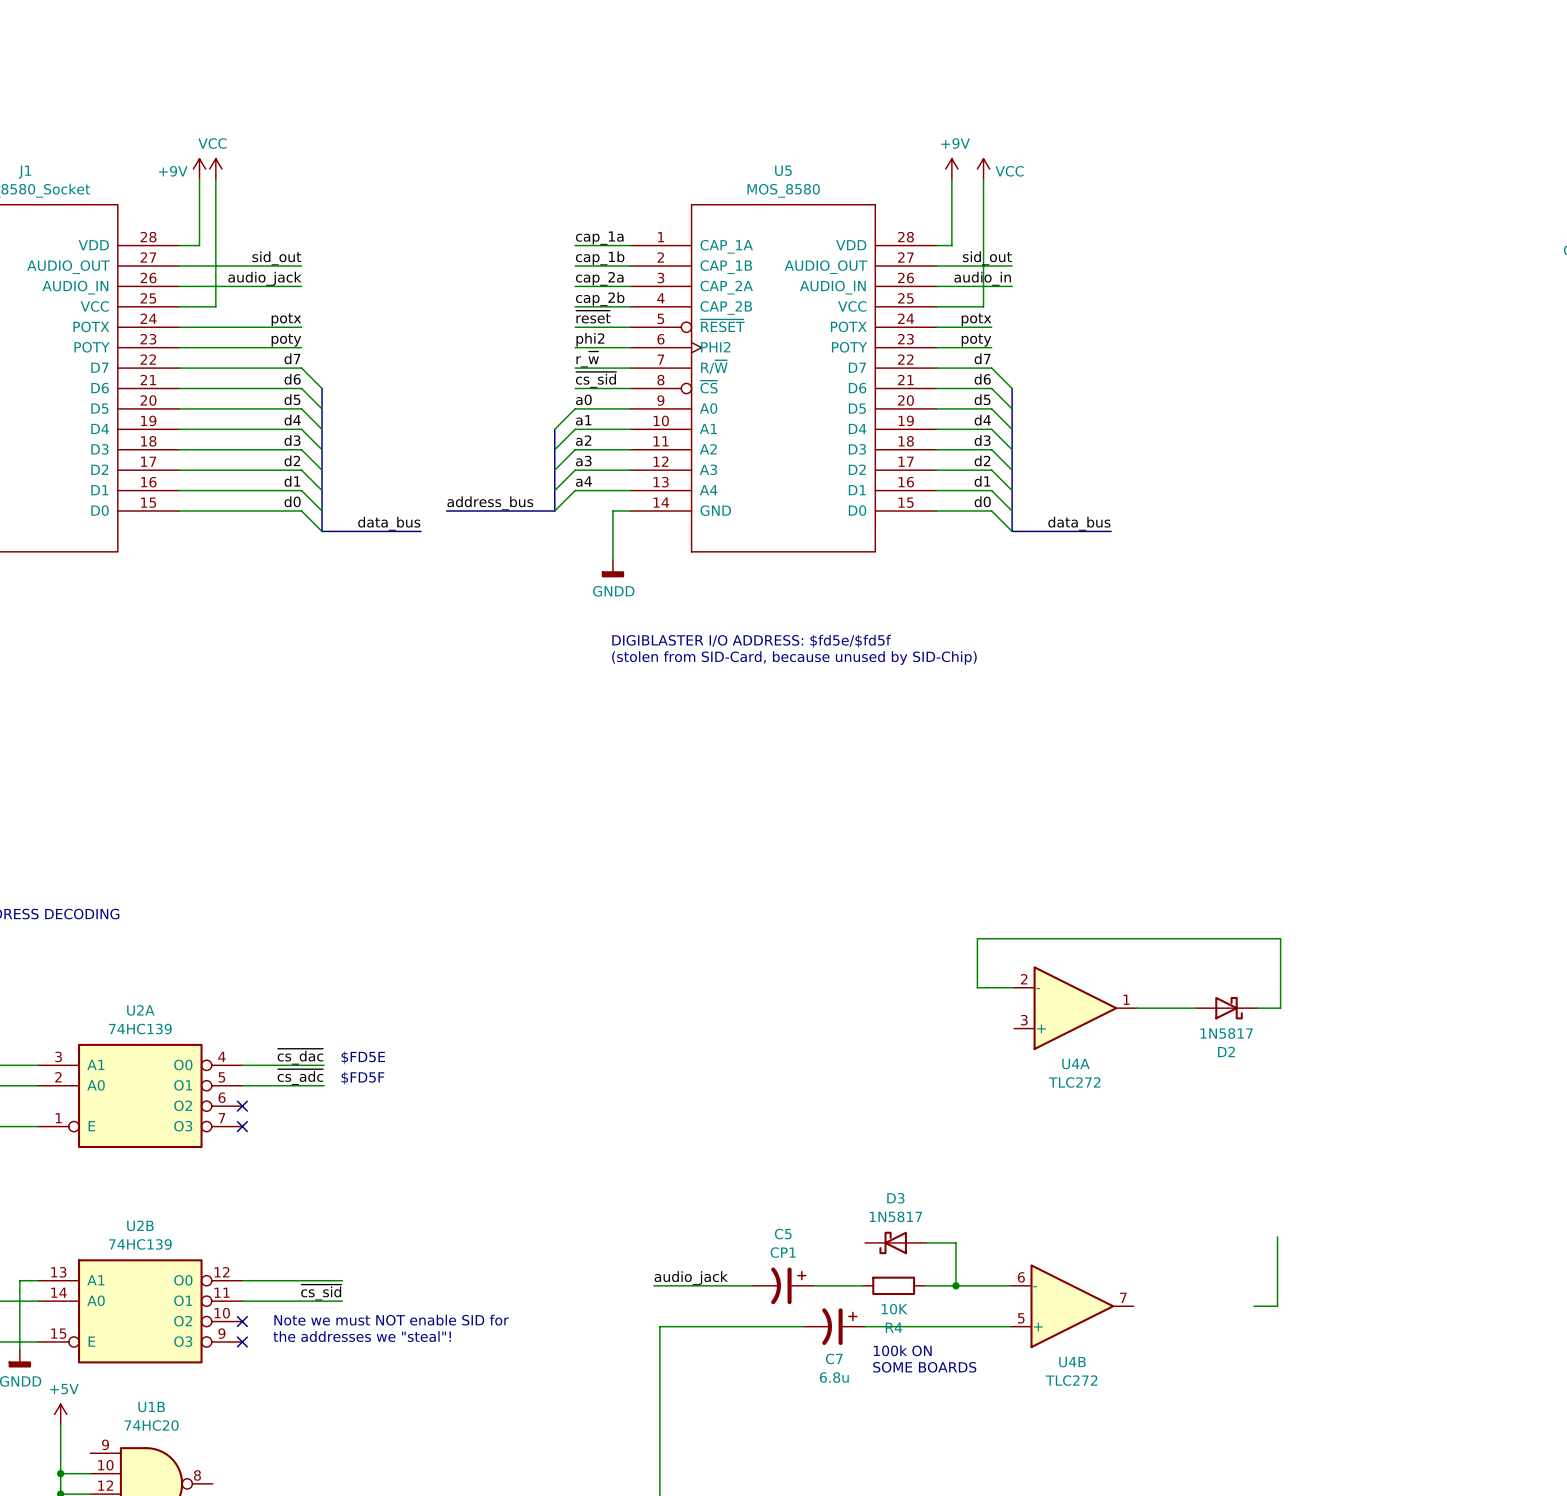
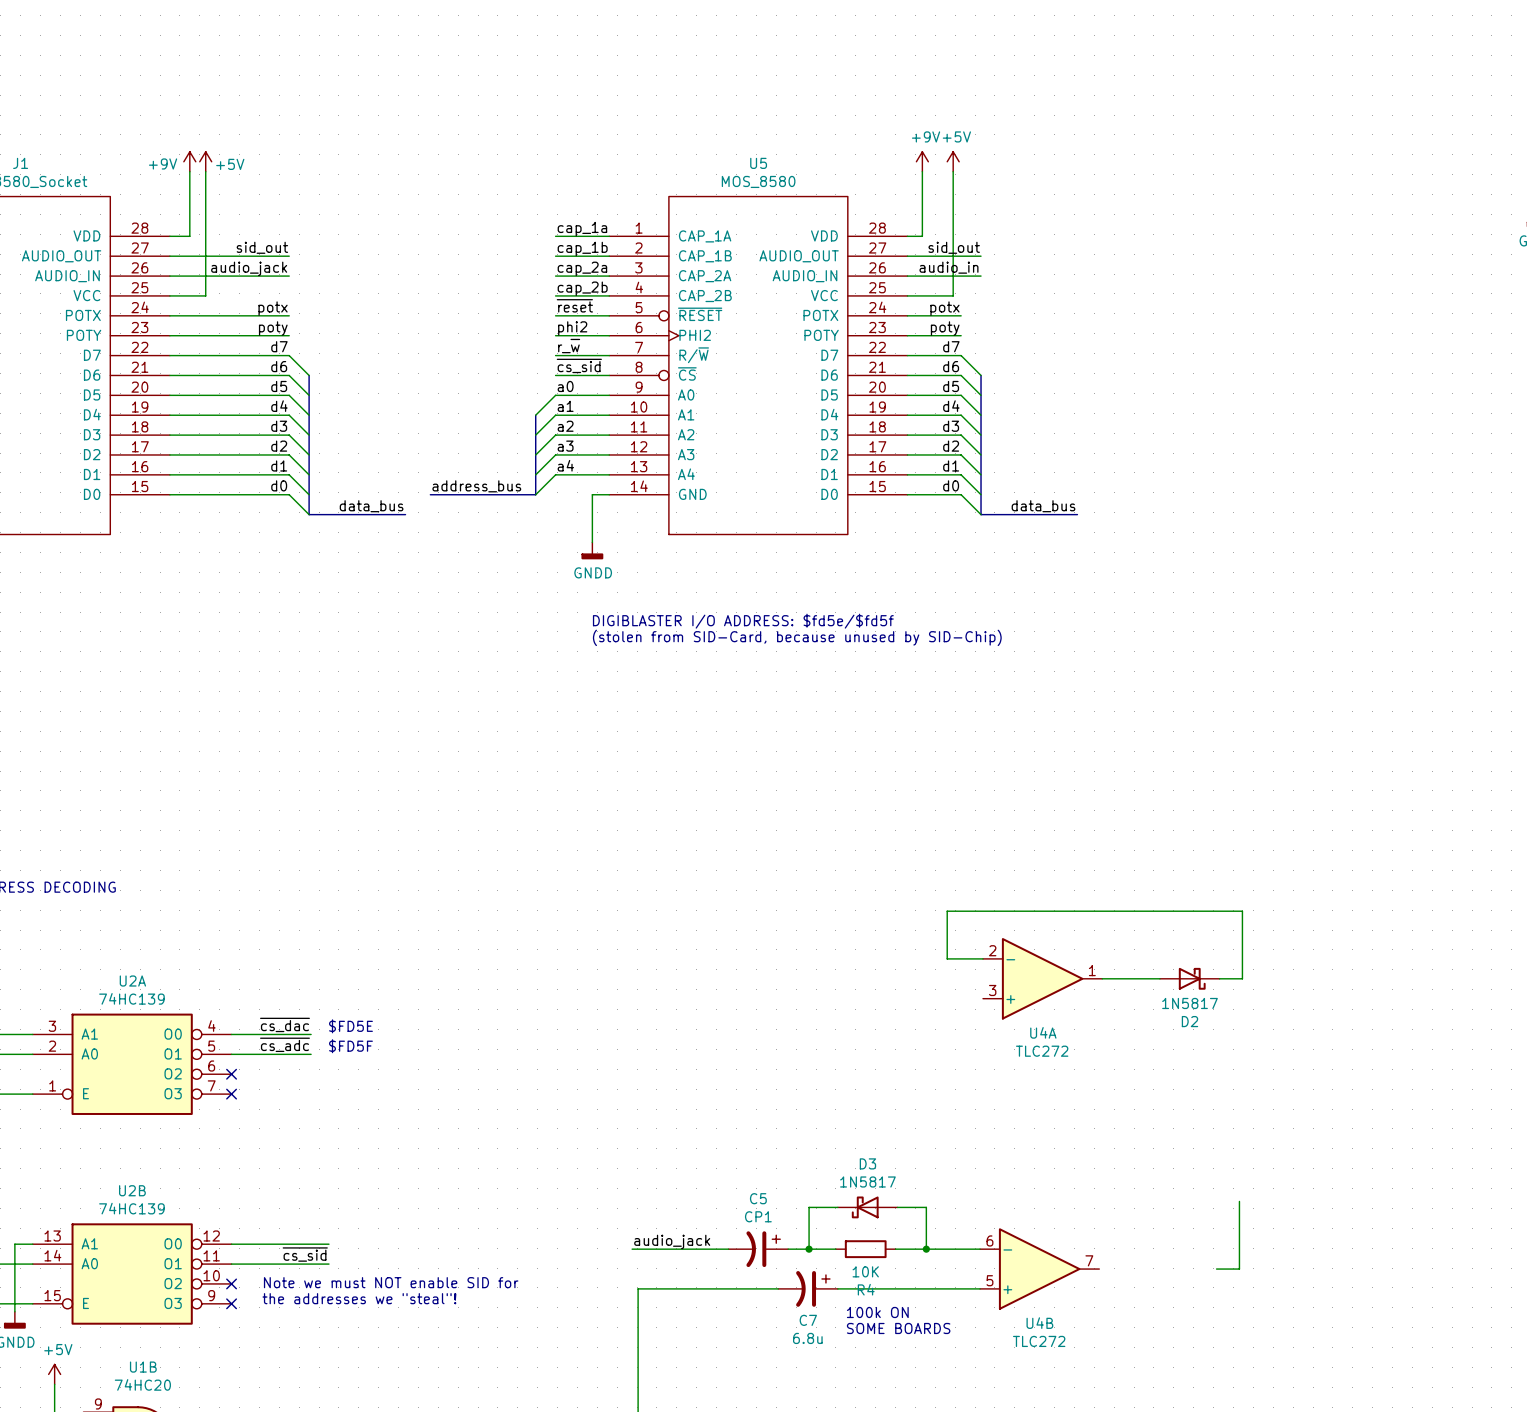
power symbol: VCC (215, 169) -> +5V (205, 161)
power symbol: VCC (983, 169) -> +5V (953, 161)
wire: none -> (837, 1207) (809, 1207) (809, 1249)
junction: none -> (809, 1249)

